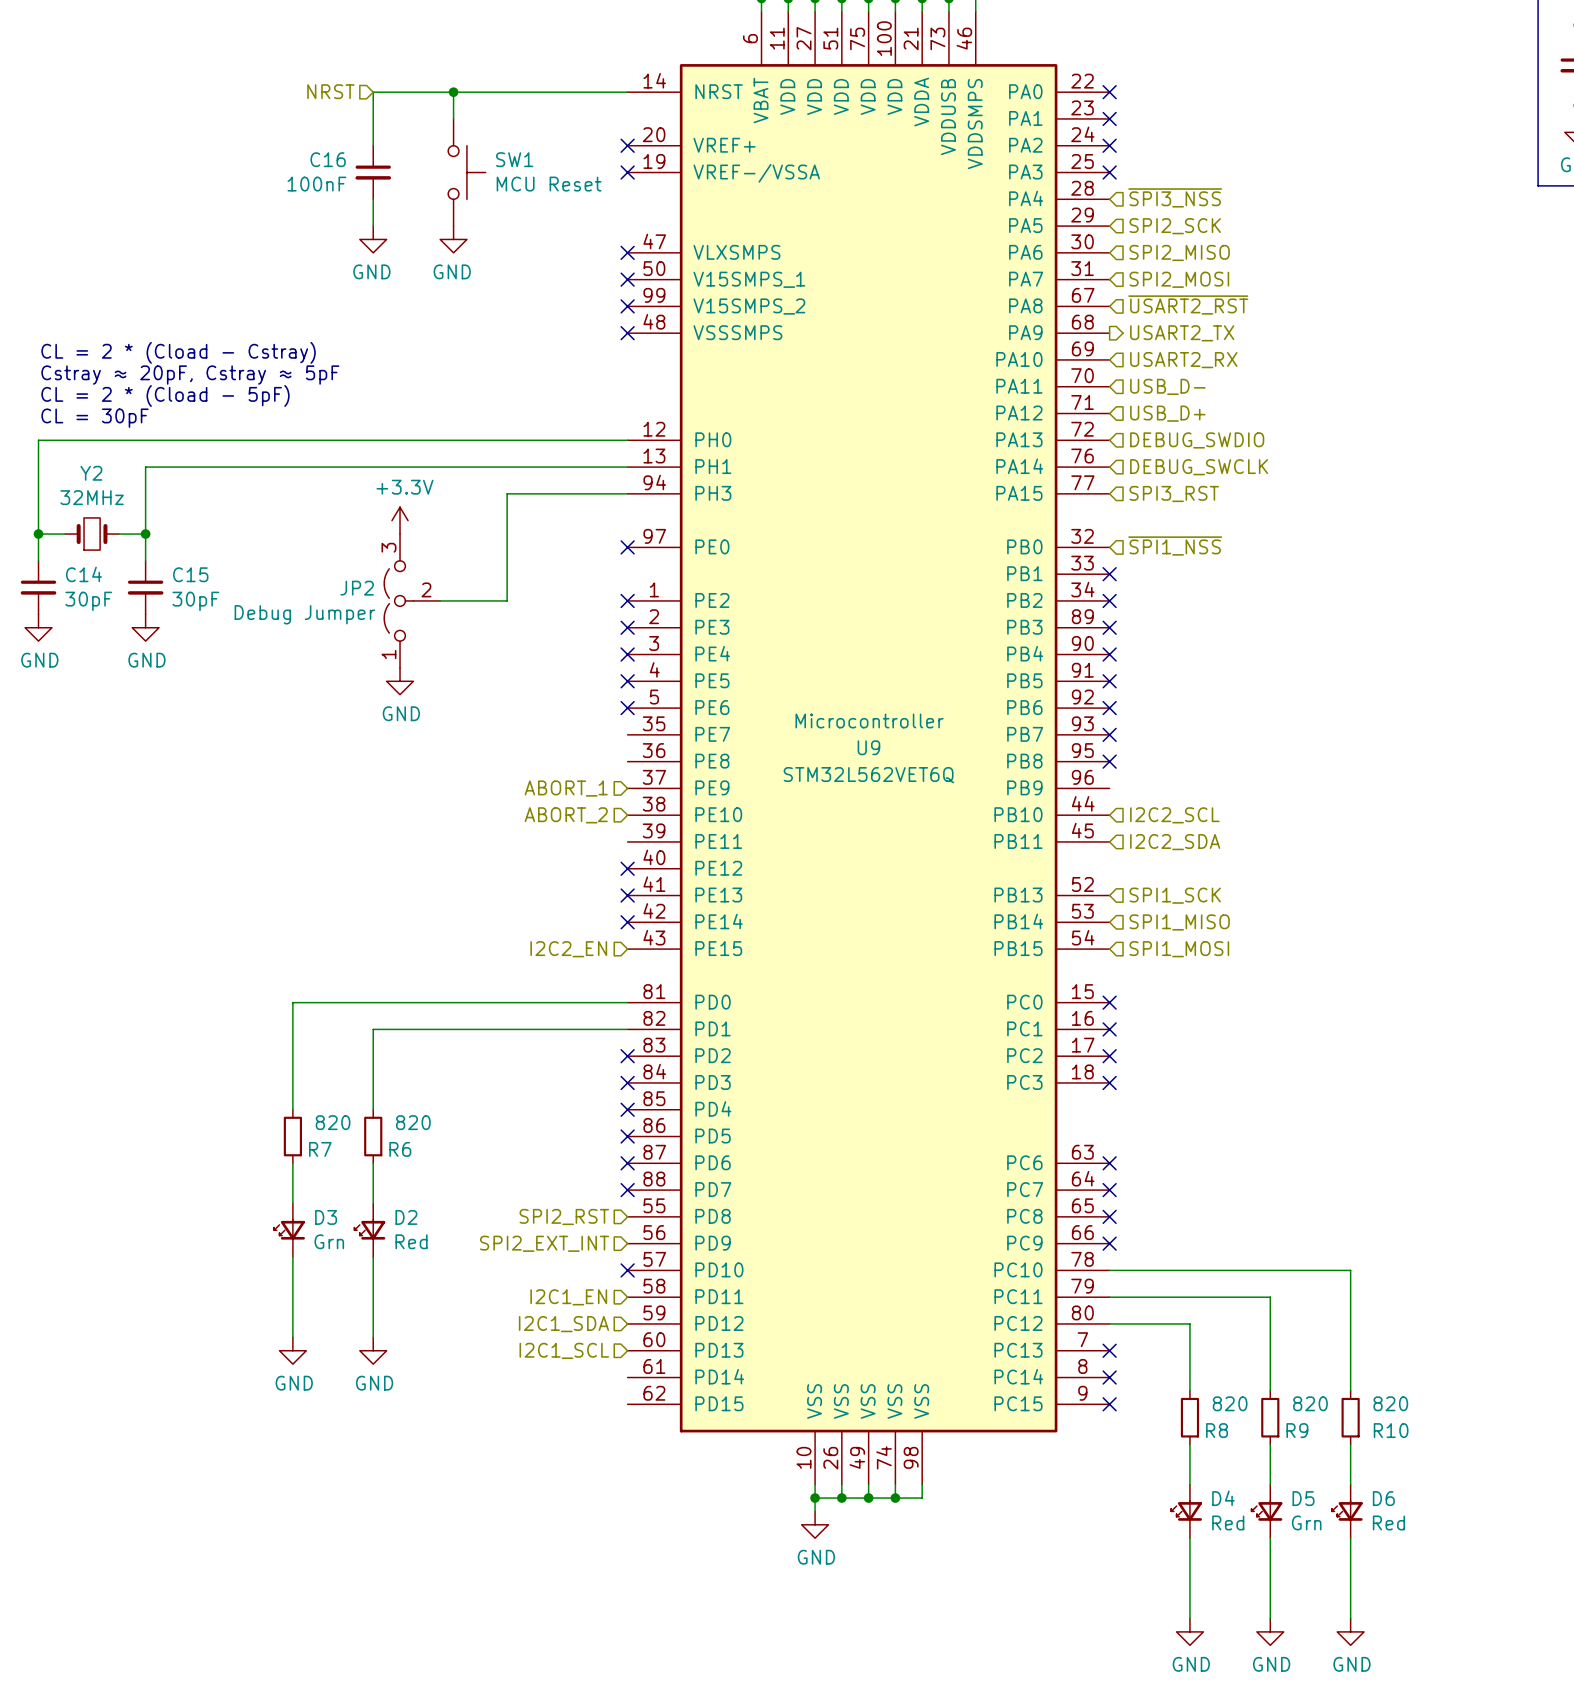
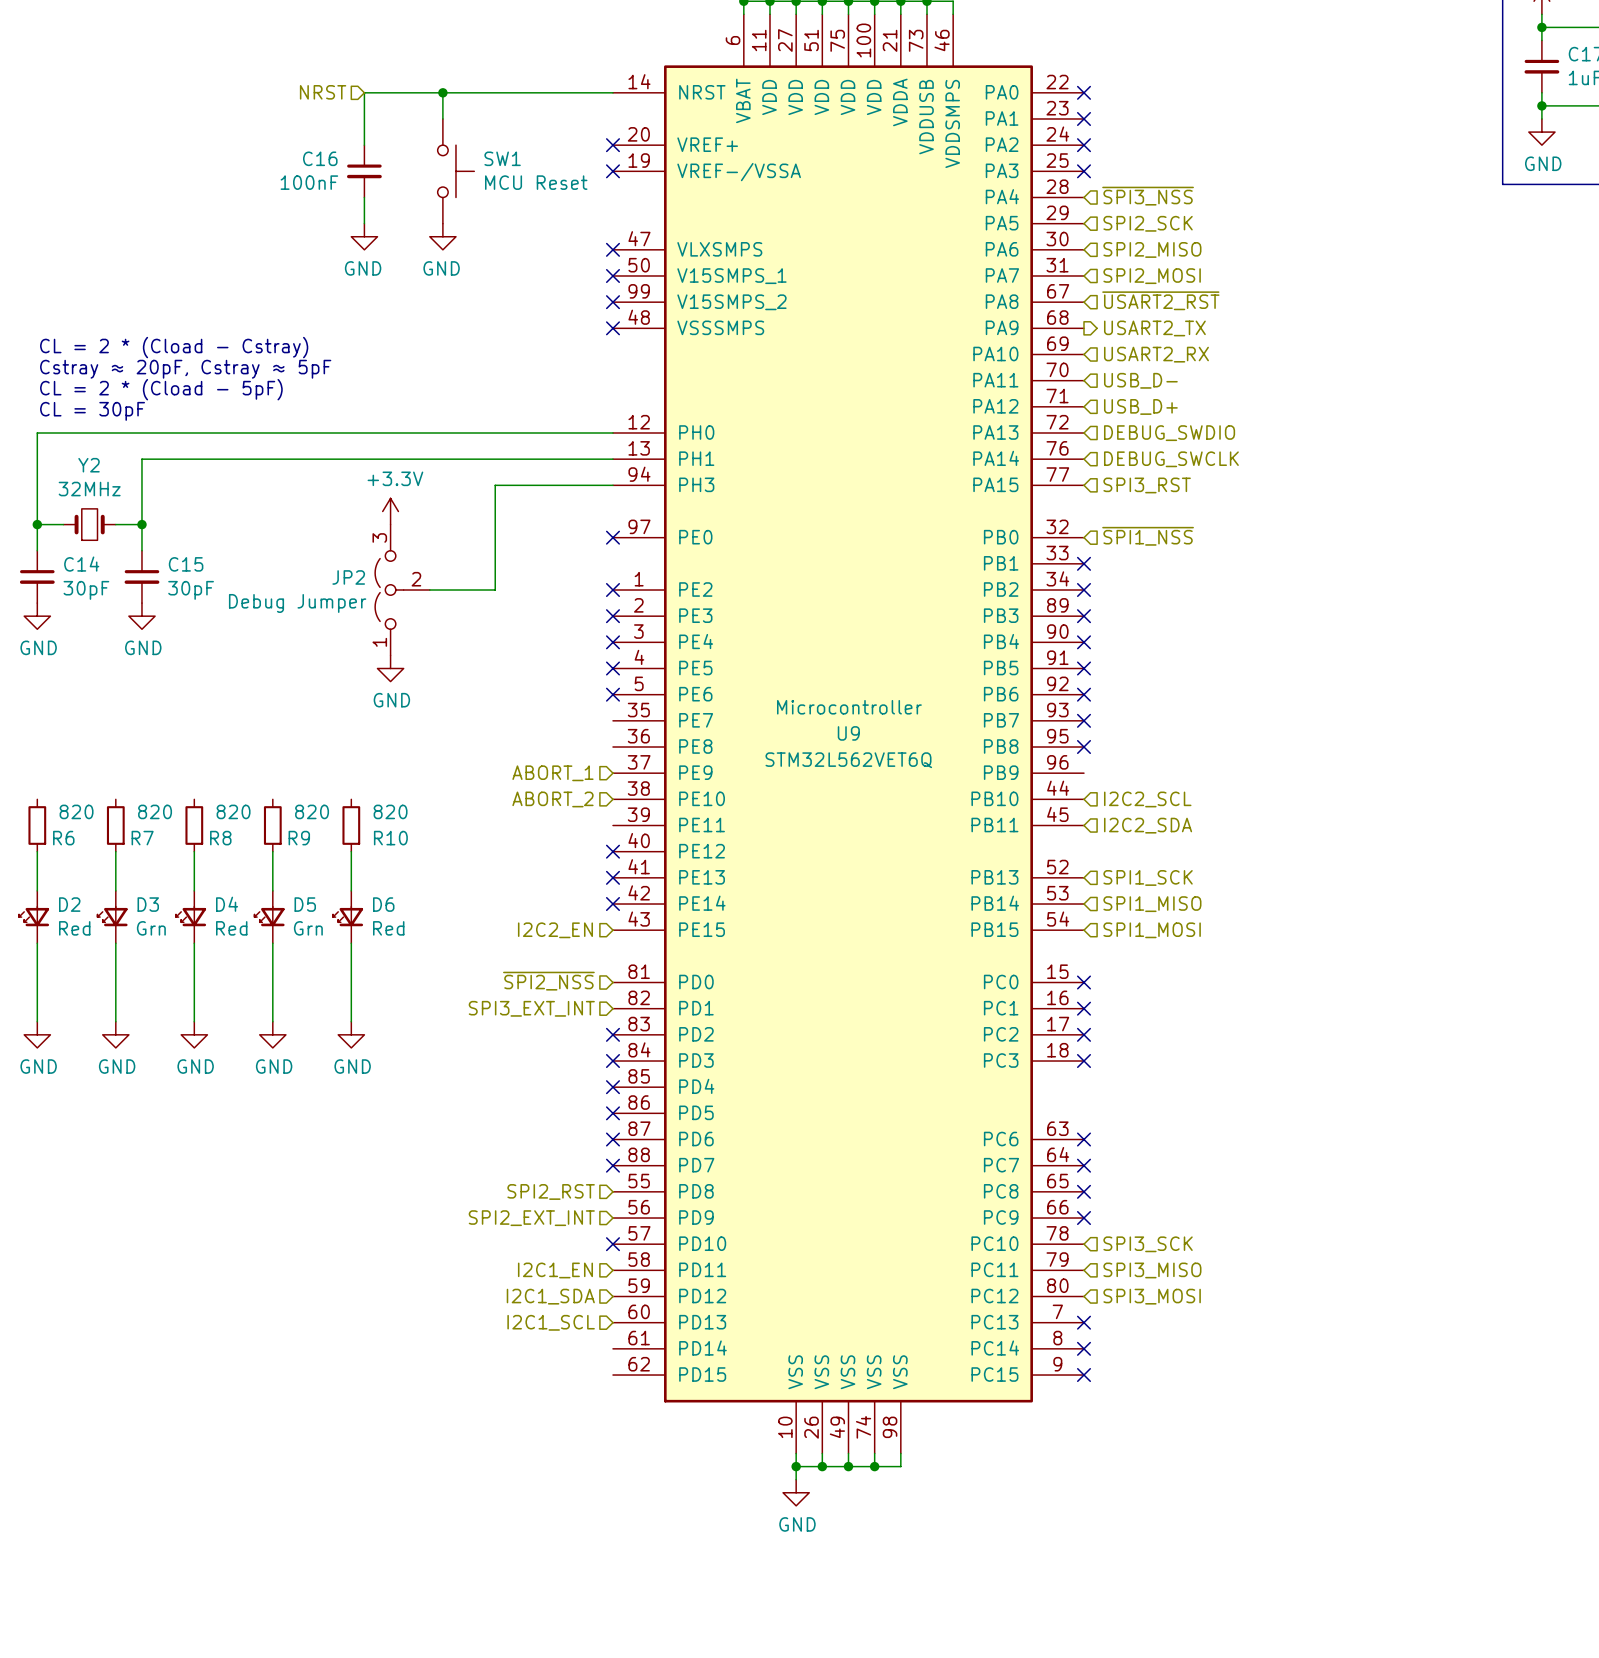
wire: none -> (37, 851) (37, 890)
wire: none -> (115, 851) (115, 890)
wire: none -> (194, 851) (194, 890)
wire: none -> (272, 851) (272, 890)
wire: none -> (351, 851) (351, 890)
wire: none -> (37, 943) (37, 1021)
wire: none -> (115, 943) (115, 1021)
wire: none -> (194, 943) (194, 1021)
wire: none -> (272, 943) (272, 1021)
wire: none -> (351, 943) (351, 1021)
hierarchical label: none -> ~{SPI2_NSS} (548, 981)
wire: (627, 1002) (292, 1002) (292, 1109) -> none
hierarchical label: none -> SPI3_EXT_INT (531, 1008)
wire: (627, 1029) (373, 1029) (373, 1109) -> none
power symbol: none -> GND (37, 1034)
power symbol: none -> GND (115, 1034)
power symbol: none -> GND (194, 1034)
power symbol: none -> GND (272, 1034)
power symbol: none -> GND (351, 1034)
R7 position: (292, 1136) -> (115, 825)
R6 position: (373, 1136) -> (37, 825)
wire: (292, 1163) (292, 1203) -> none
wire: (373, 1163) (373, 1203) -> none
D3 position: (289, 1230) -> (112, 917)
D2 position: (369, 1230) -> (34, 917)
wire: (292, 1257) (292, 1337) -> none
wire: (373, 1257) (373, 1337) -> none
wire: (1109, 1270) (1350, 1270) (1350, 1390) -> none
hierarchical label: none -> SPI3_SCK (1148, 1244)
wire: (1109, 1297) (1270, 1297) (1270, 1390) -> none
hierarchical label: none -> SPI3_MISO (1152, 1270)
wire: (1109, 1323) (1189, 1323) (1189, 1390) -> none
hierarchical label: none -> SPI3_MOSI (1152, 1296)
power symbol: GND (292, 1350) -> none
power symbol: GND (373, 1350) -> none
R8 position: (1189, 1417) -> (194, 825)
R9 position: (1270, 1417) -> (272, 825)
R10 position: (1350, 1417) -> (351, 825)
wire: (1189, 1444) (1189, 1484) -> none
wire: (1270, 1444) (1270, 1484) -> none
wire: (1350, 1444) (1350, 1484) -> none
D4 position: (1186, 1511) -> (191, 917)
D5 position: (1266, 1511) -> (269, 917)
D6 position: (1347, 1511) -> (348, 917)
wire: (1189, 1538) (1189, 1618) -> none
wire: (1270, 1538) (1270, 1618) -> none
wire: (1350, 1538) (1350, 1618) -> none
power symbol: GND (1189, 1631) -> none
power symbol: GND (1270, 1631) -> none
power symbol: GND (1350, 1631) -> none

